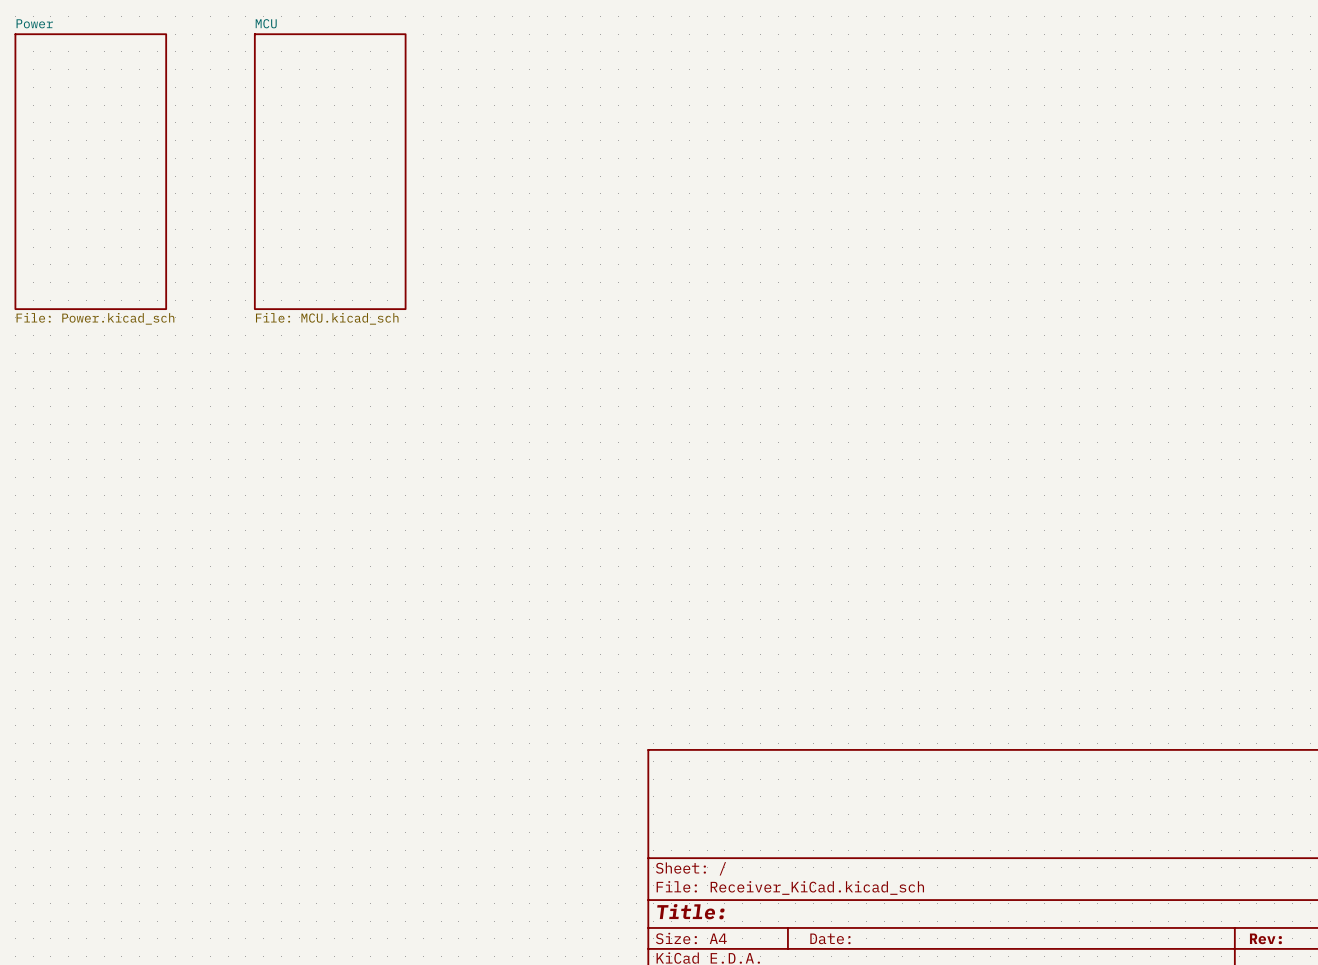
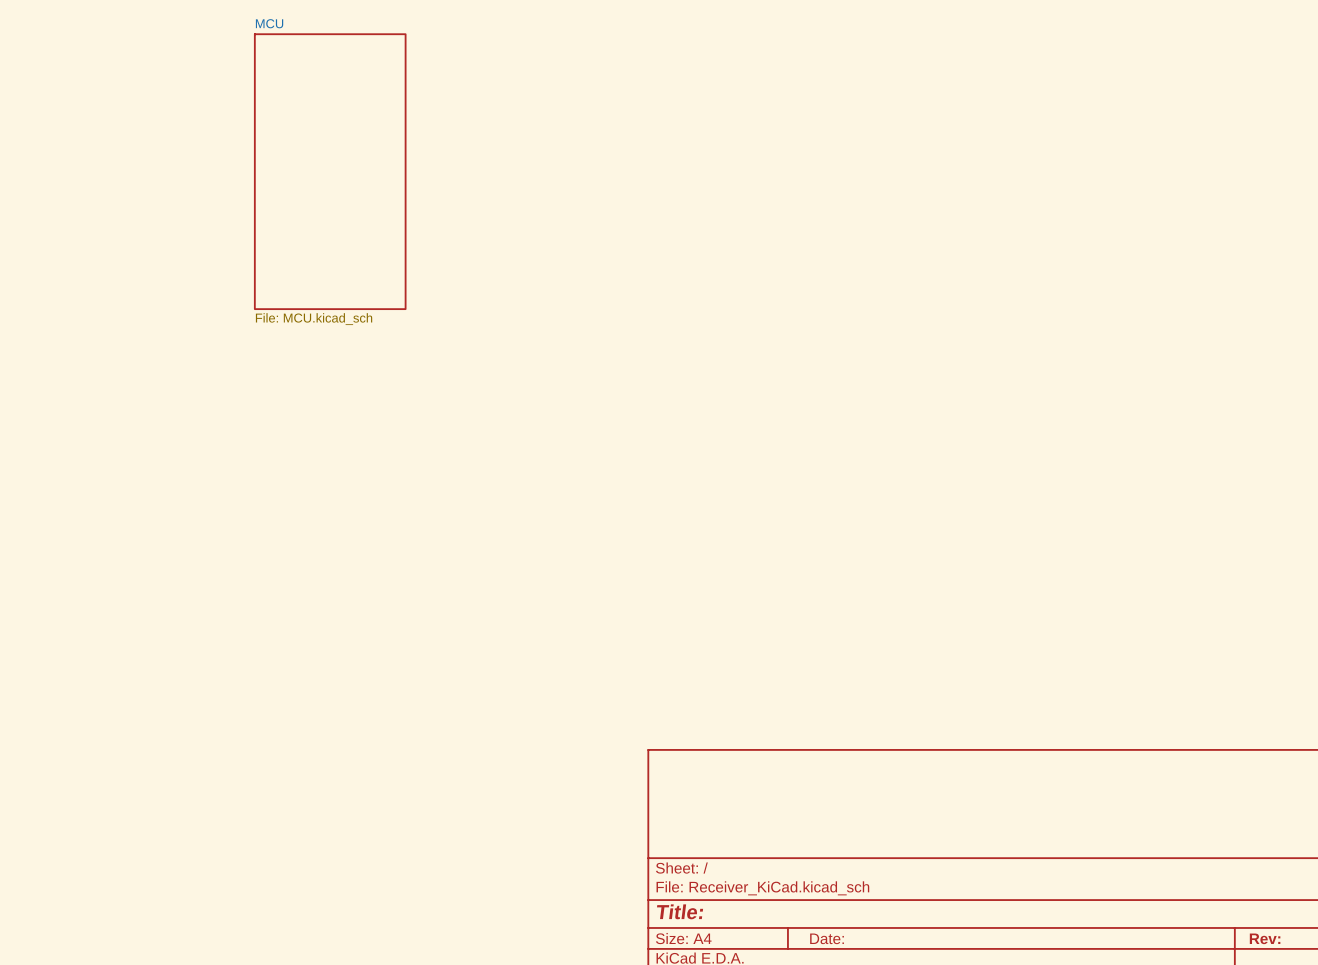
sheet Power: File: Power.kicad_sch (90, 171) -> none

